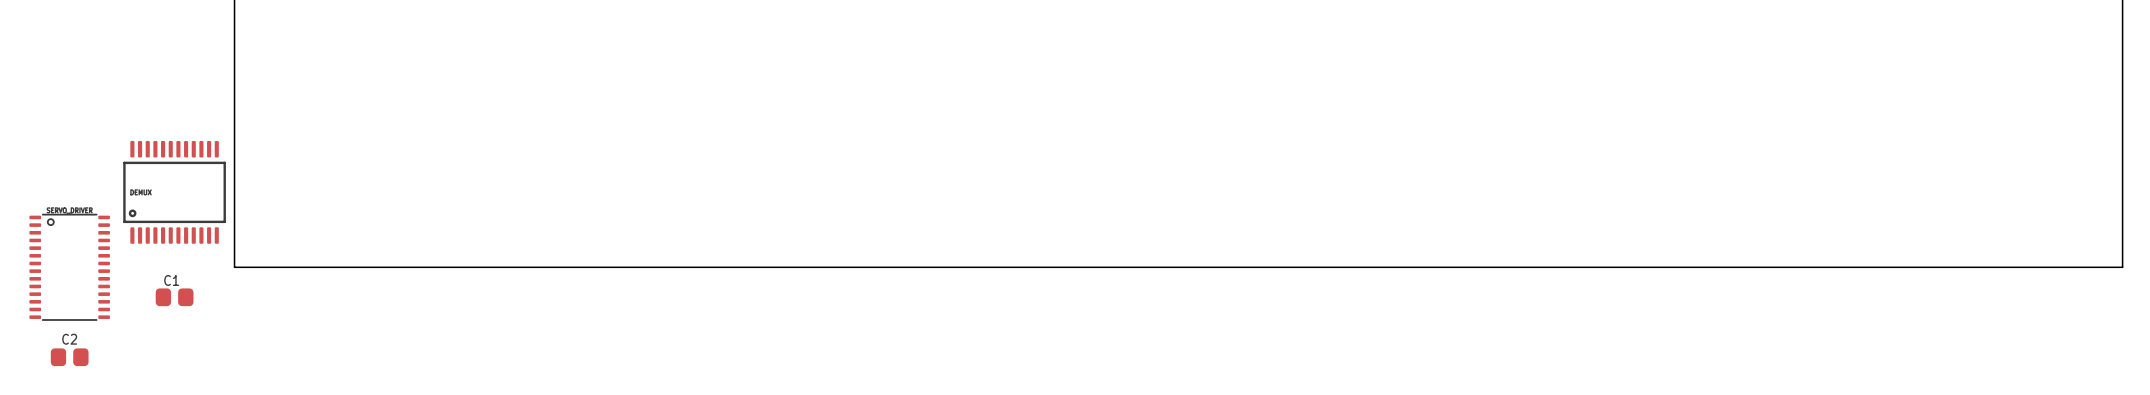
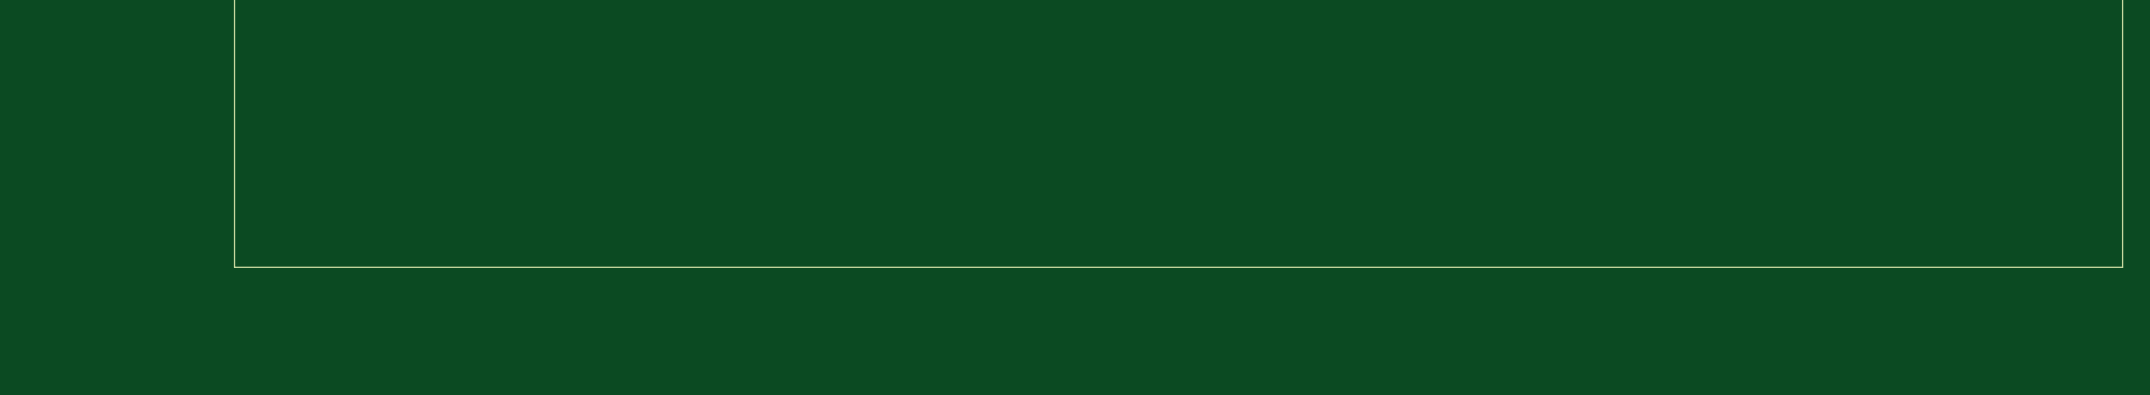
part: (174, 192) -> none
part: (69, 267) -> none
C1: (174, 297) -> none
C2: (69, 357) -> none

